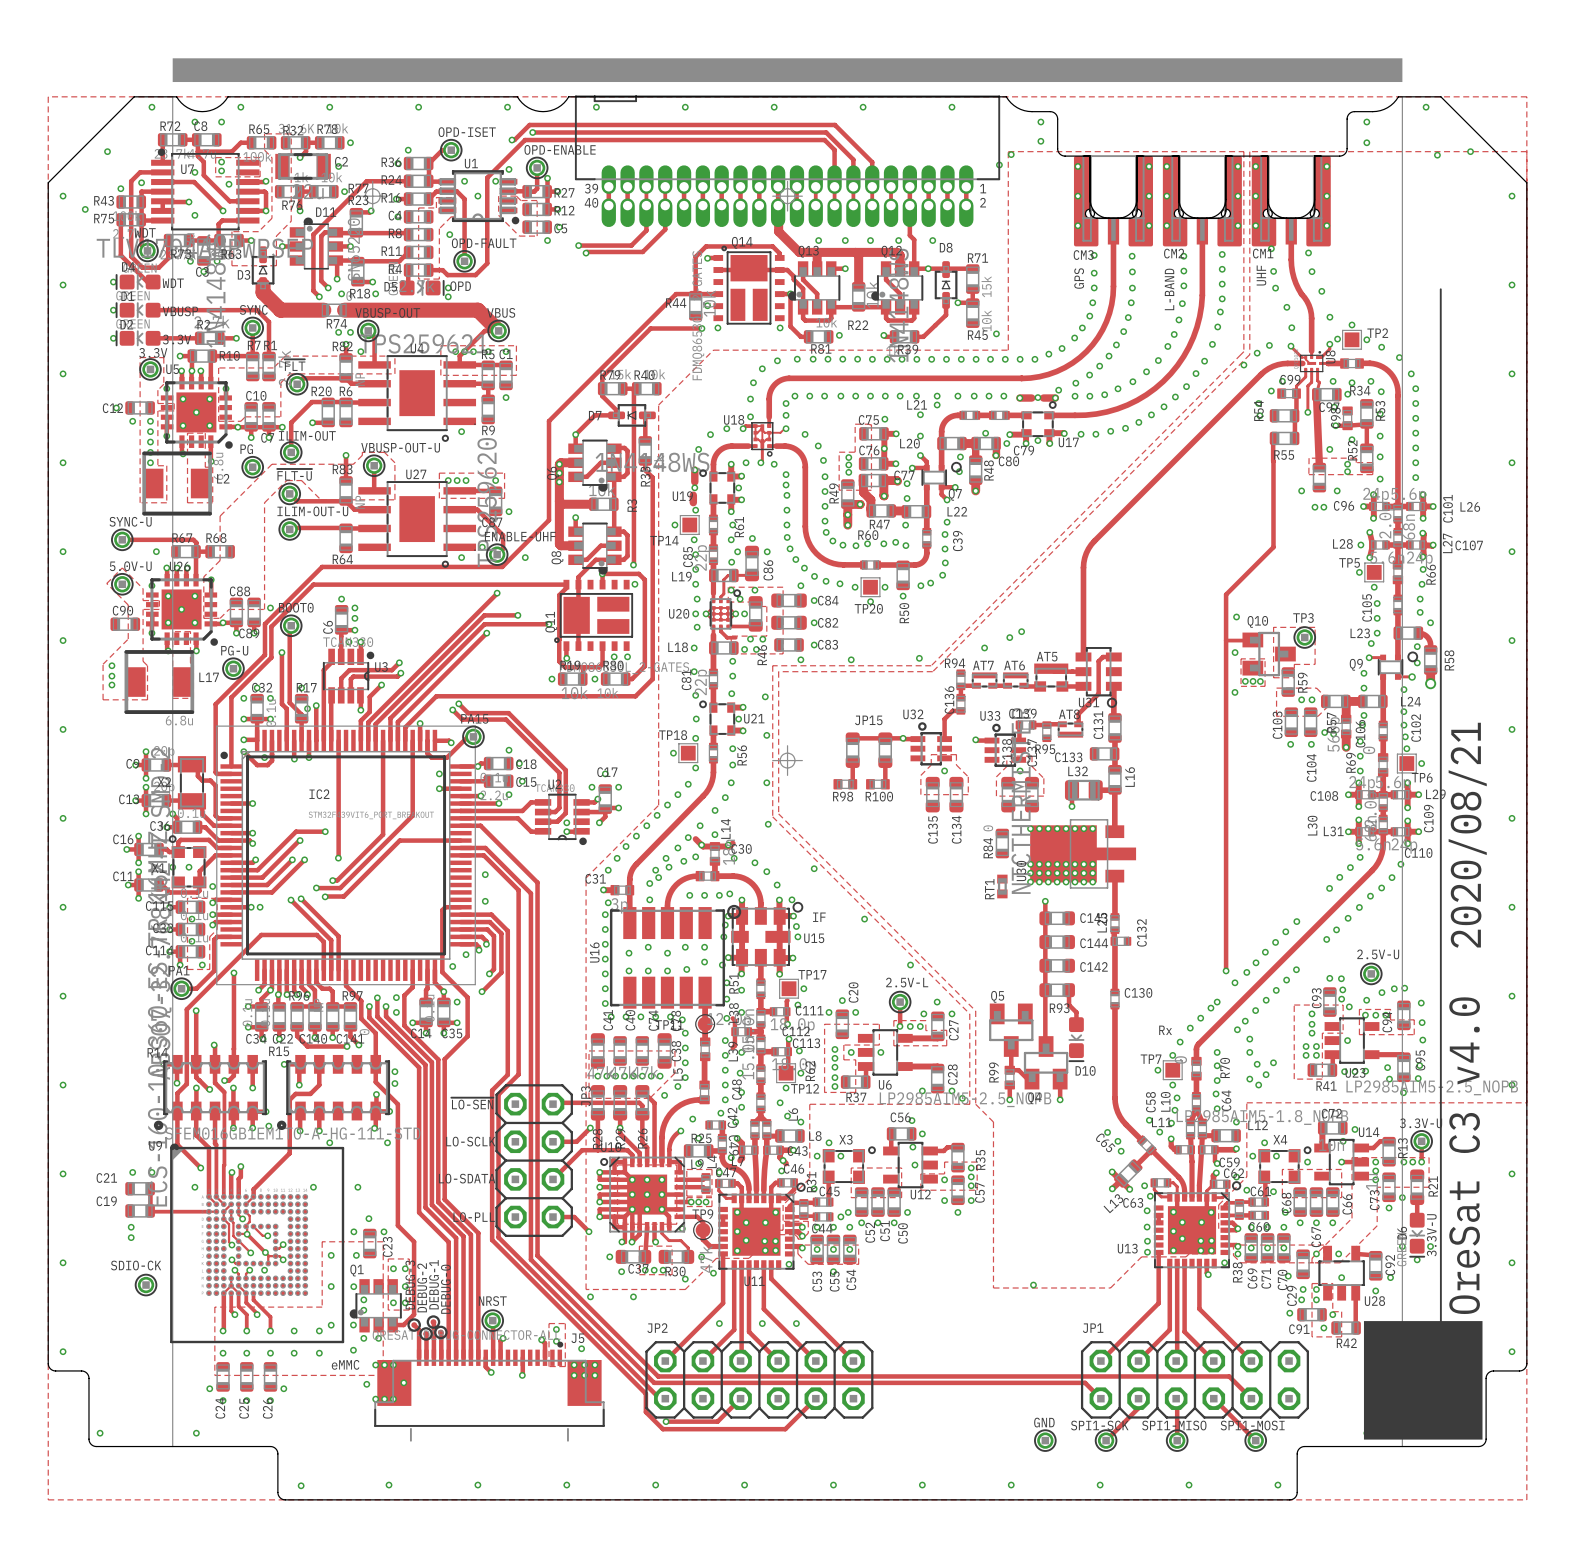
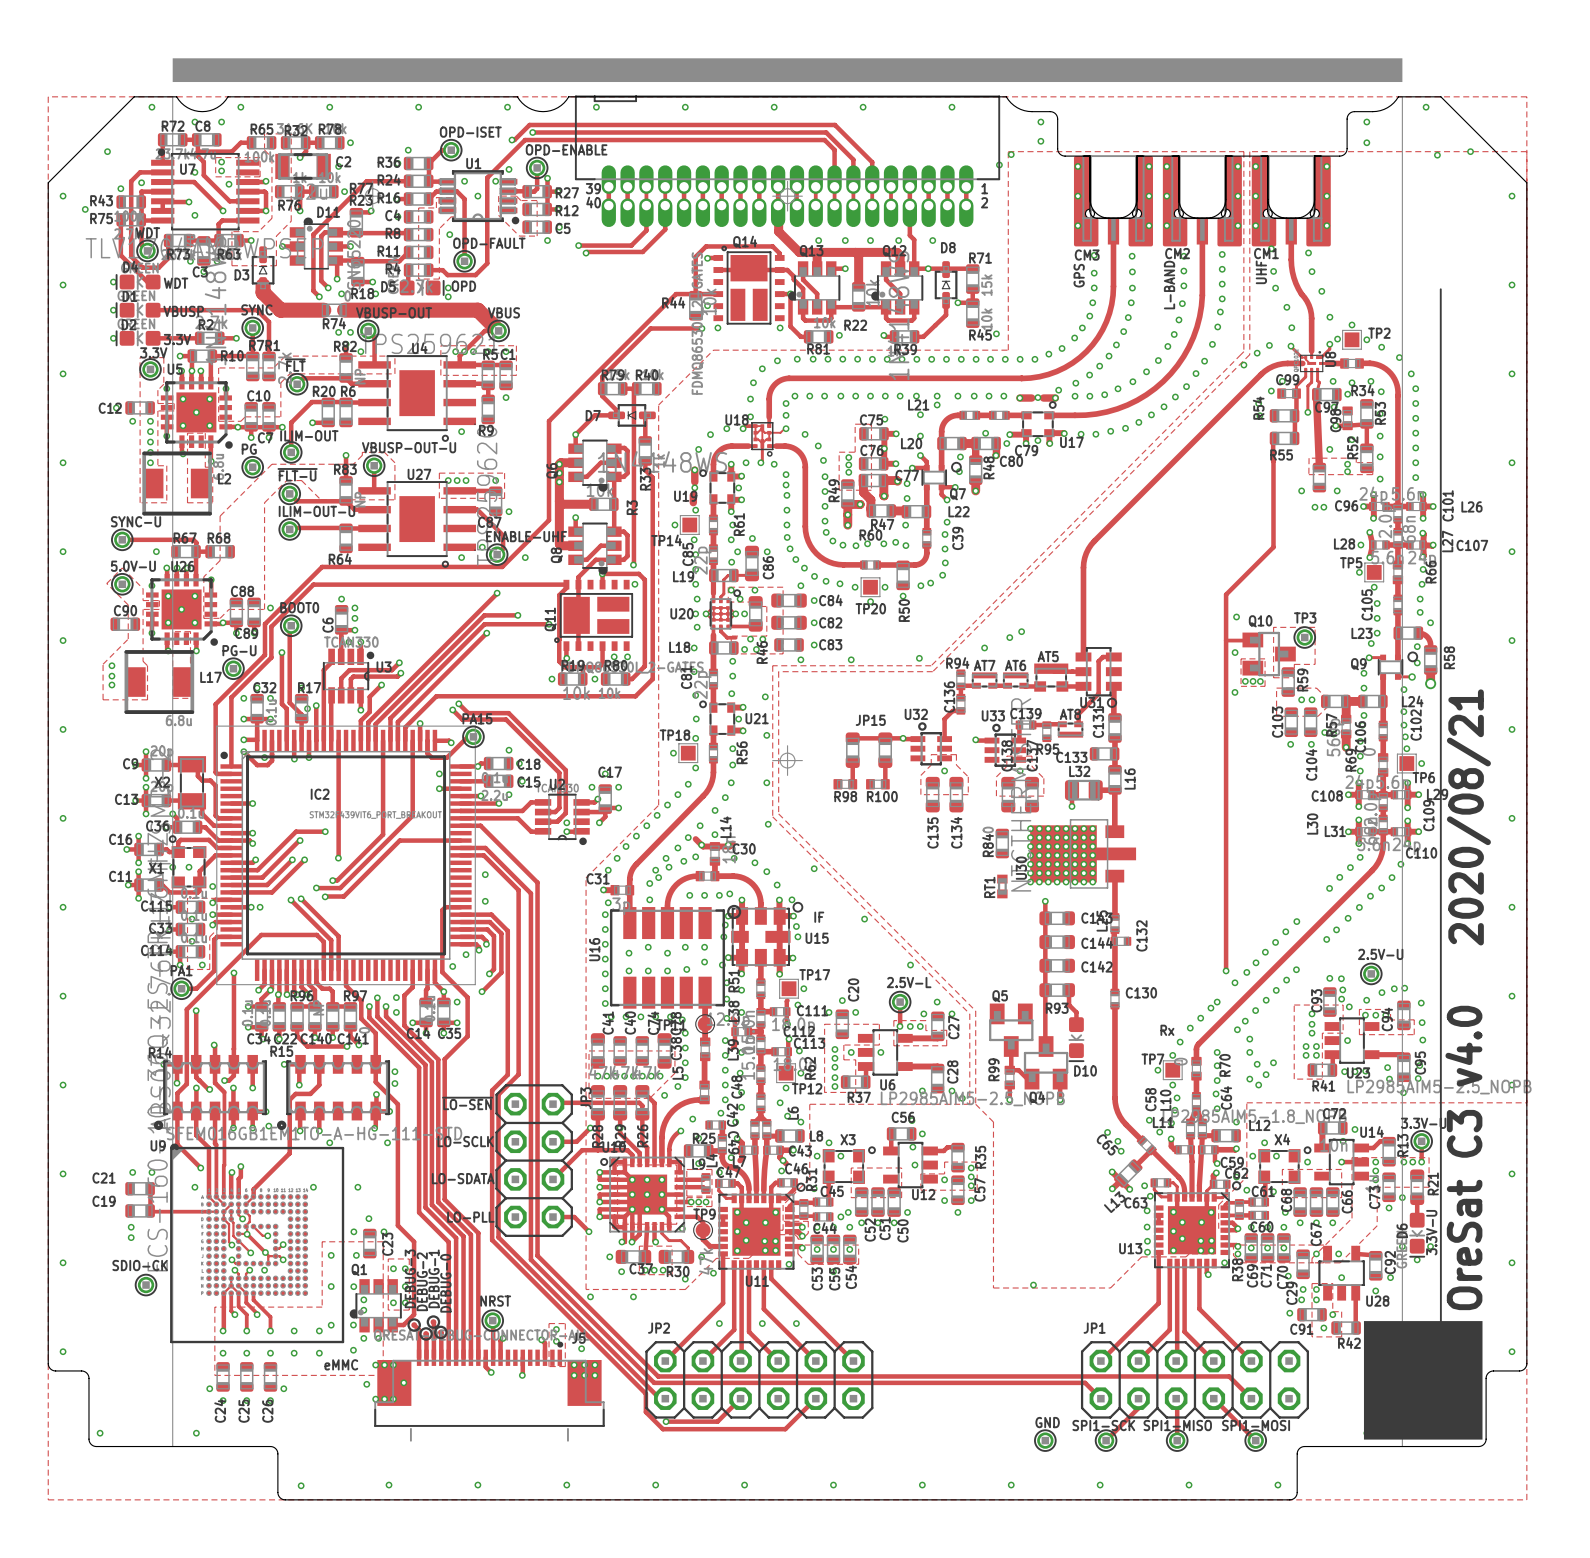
via: none -> (1030, 837)
via: none -> (1039, 837)
via: none -> (1048, 837)
via: none -> (1057, 837)
via: none -> (1066, 837)
via: none -> (1074, 837)
via: none -> (1083, 837)
via: none -> (1092, 837)
via: none -> (1030, 846)
via: none -> (1039, 846)
via: none -> (1048, 846)
via: none -> (1057, 846)
via: none -> (1066, 846)
via: none -> (1074, 846)
via: none -> (1083, 846)
via: none -> (1092, 846)
via: none -> (1030, 855)
via: none -> (1039, 855)
via: none -> (1048, 855)
via: none -> (1057, 855)
via: none -> (1066, 855)
via: none -> (1074, 855)
via: none -> (1083, 855)
via: none -> (1092, 855)

